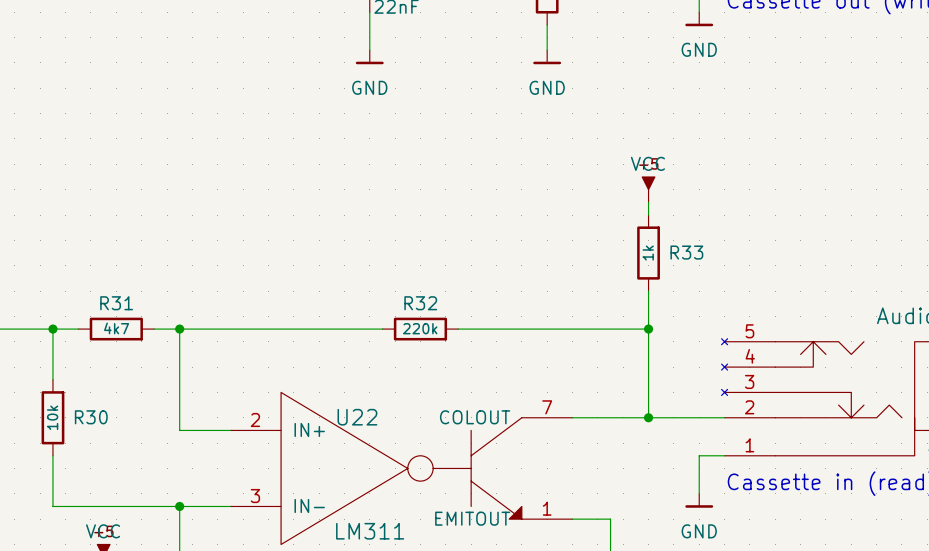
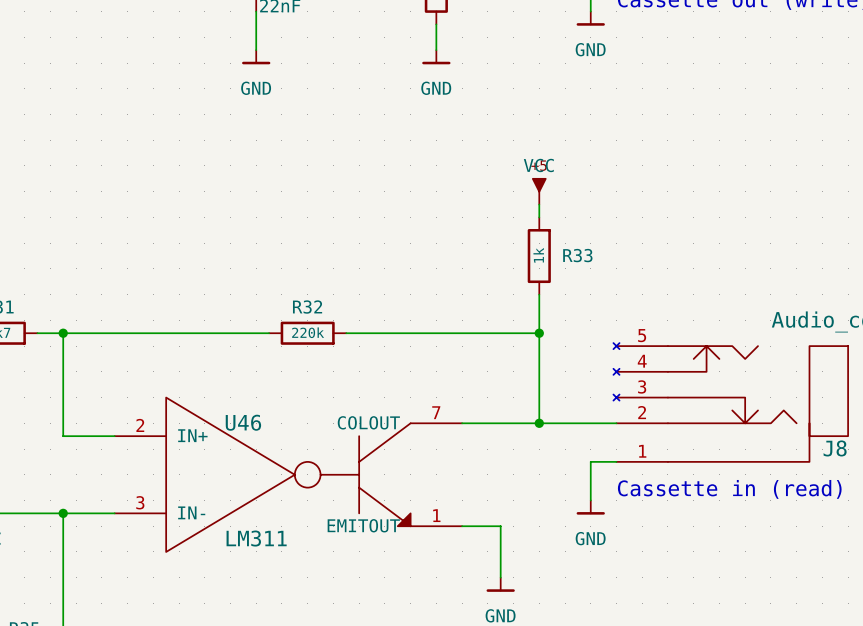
U22 name: U22 (357, 417) -> U46 (243, 422)

